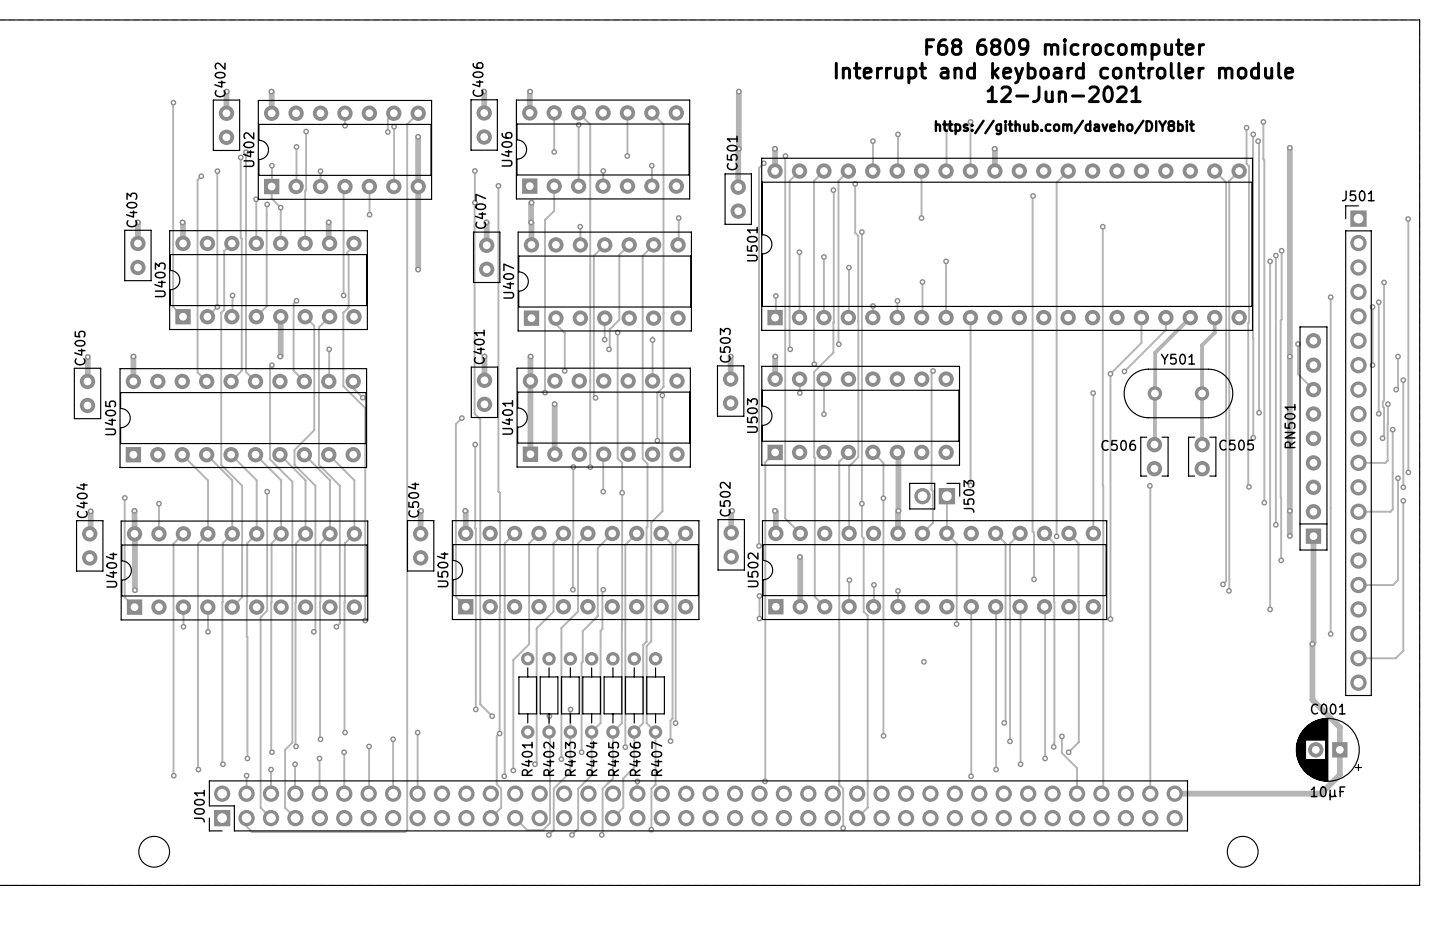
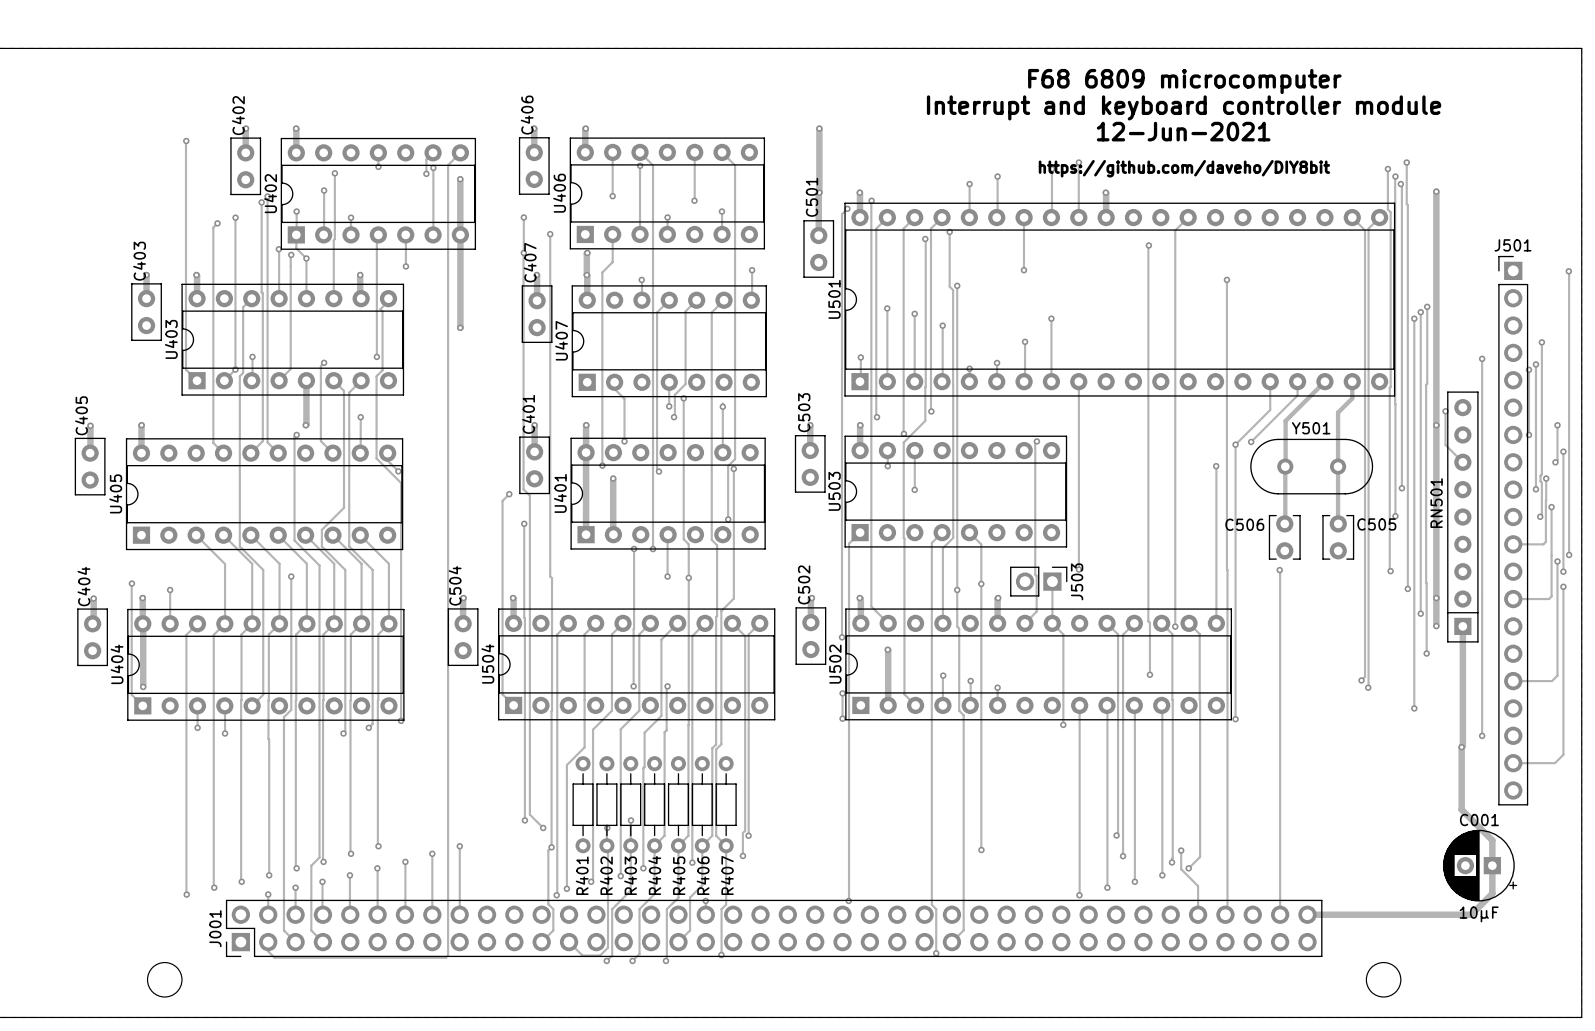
track: (897, 452) (898, 510) -> none
via: (923, 661) -> none

